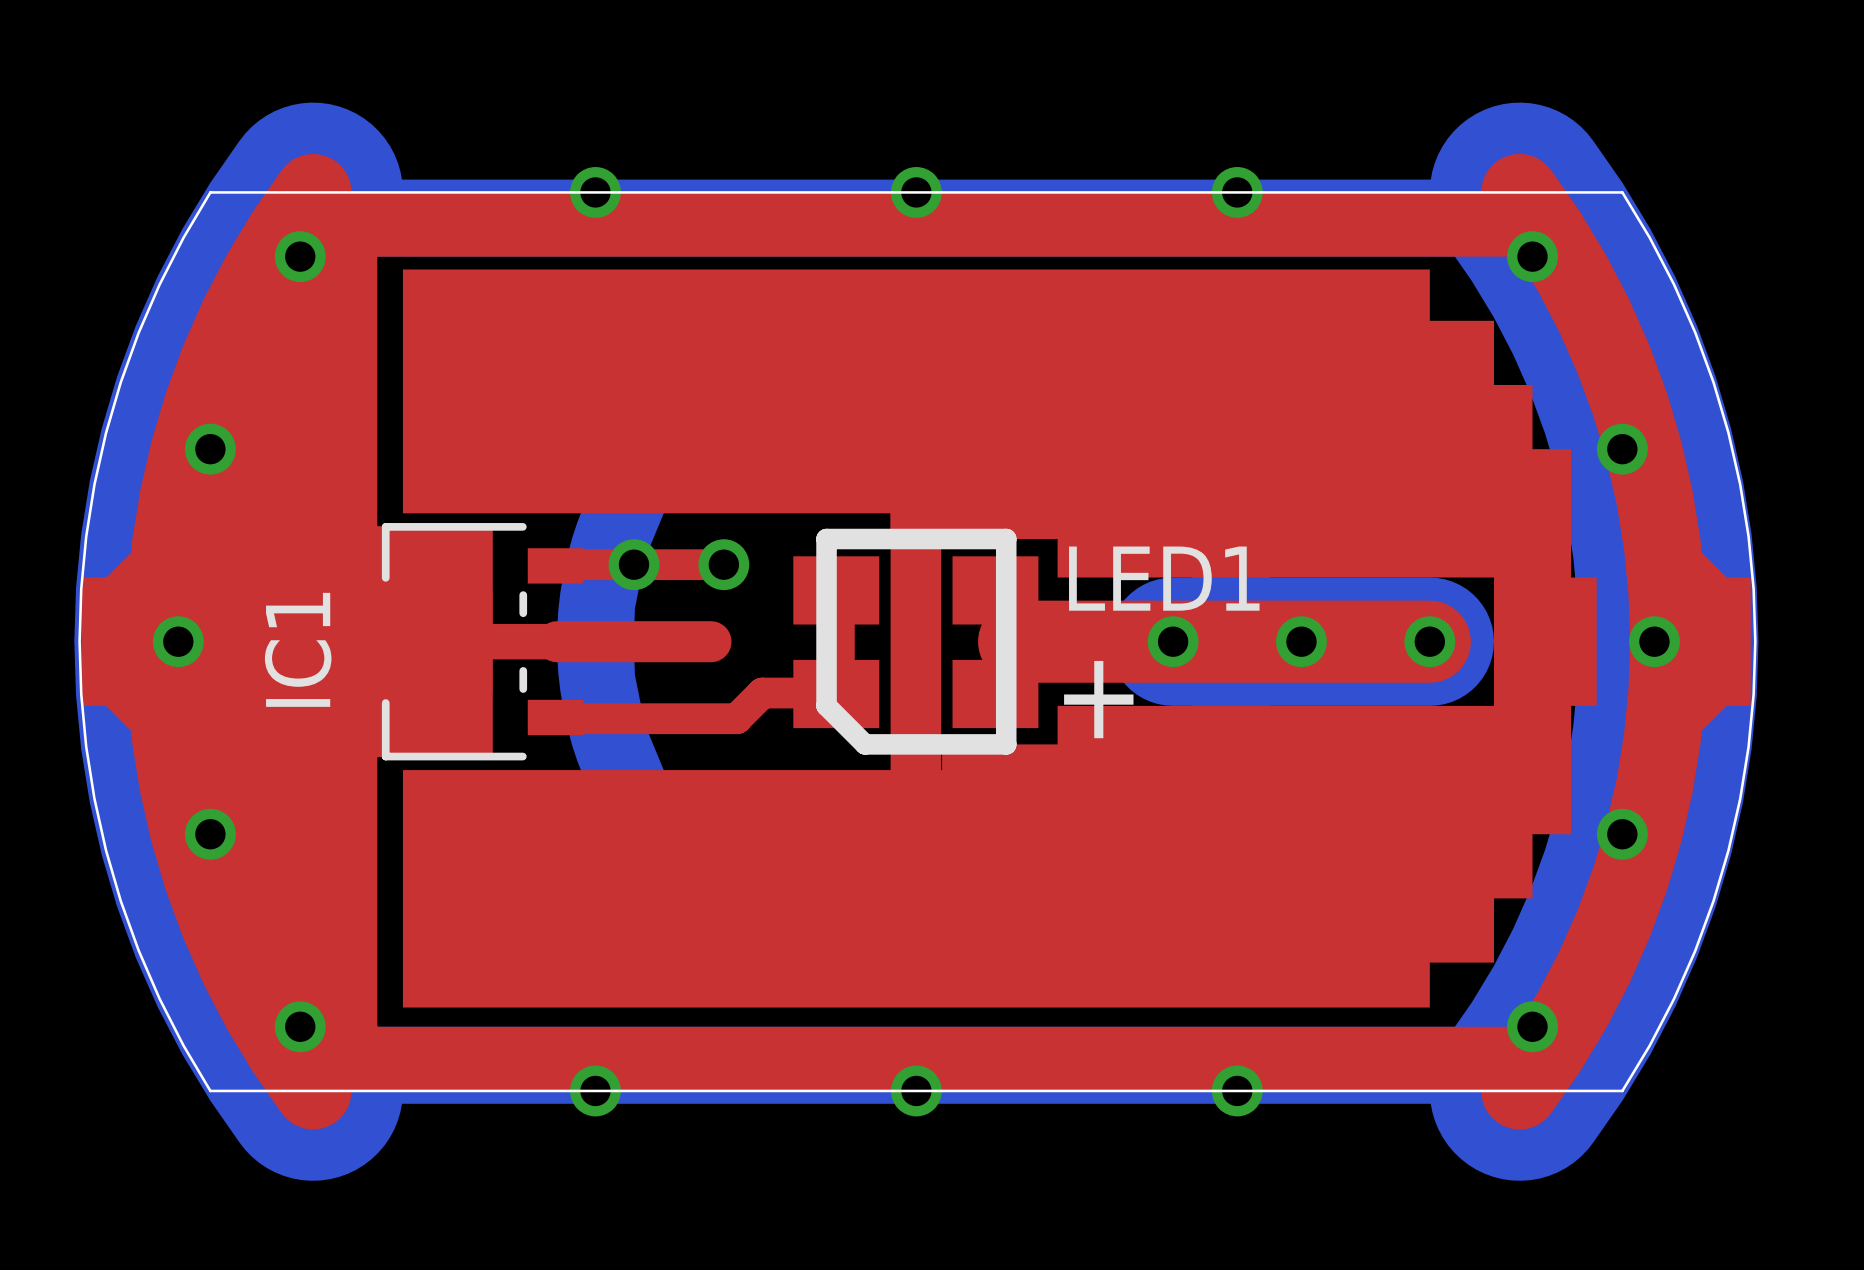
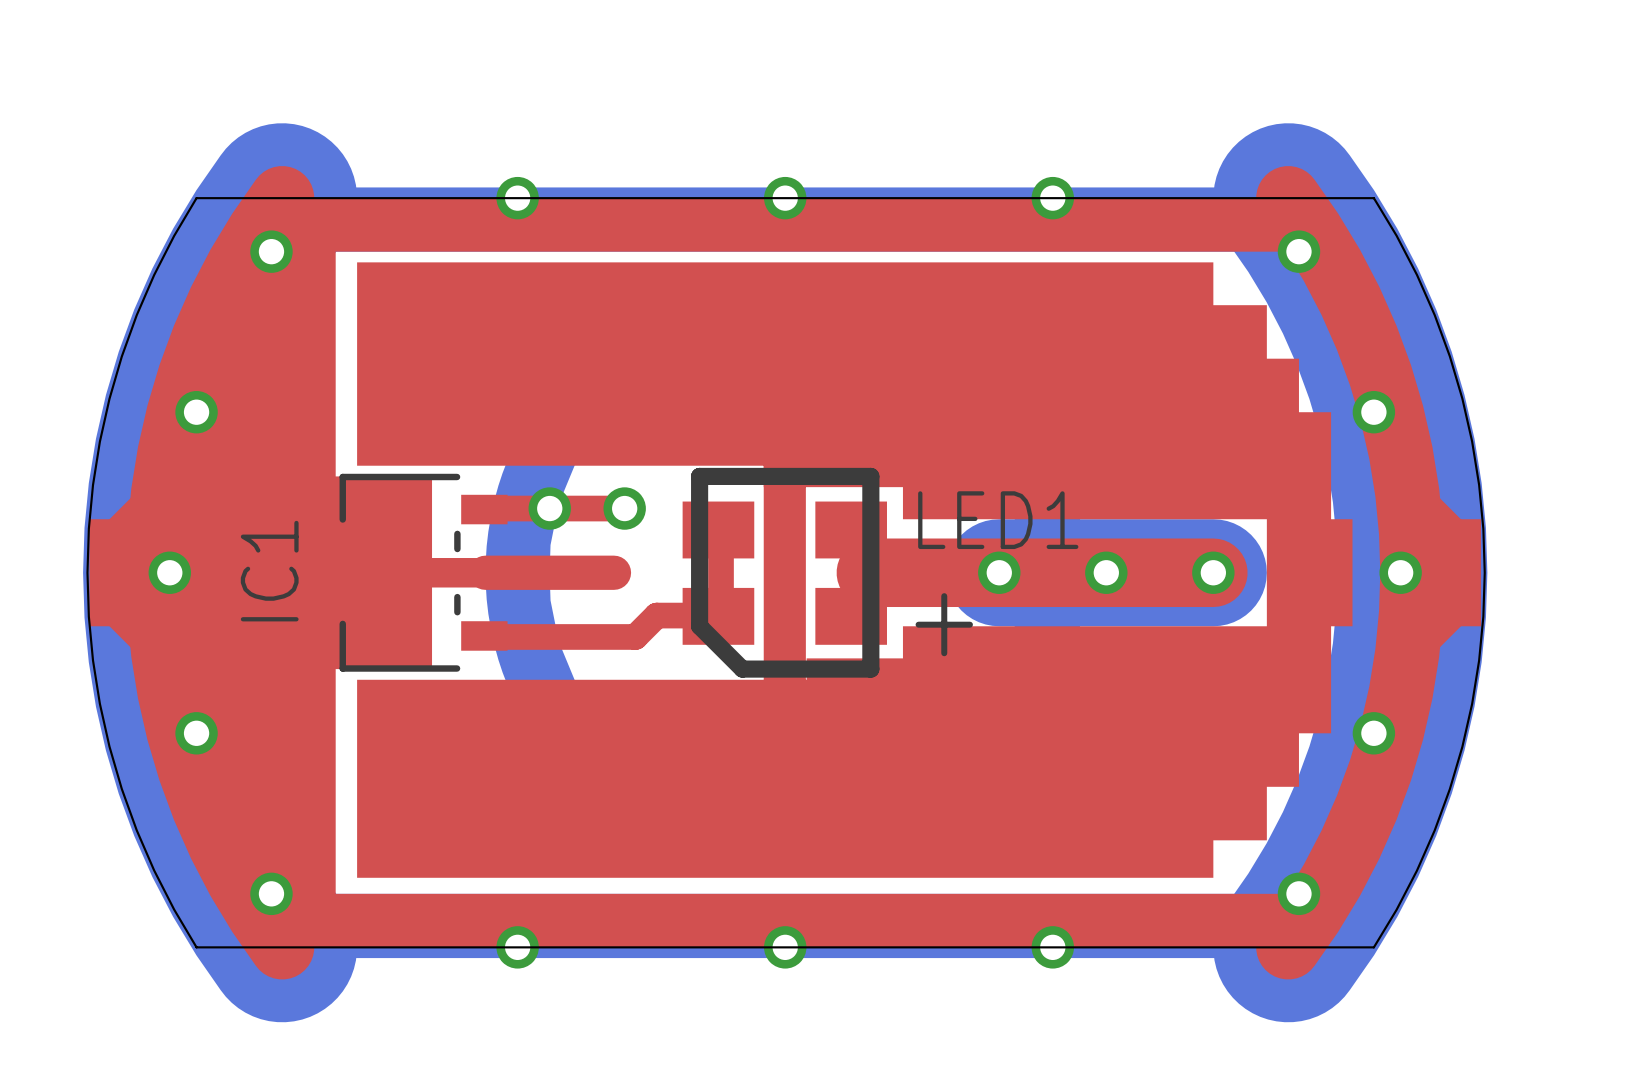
line: (826, 539) (1006, 539) (1006, 744) (865, 744) (826, 705) (826, 539) -> (699, 476) (699, 626) (742, 669) (870, 669) (870, 476) (699, 476)

